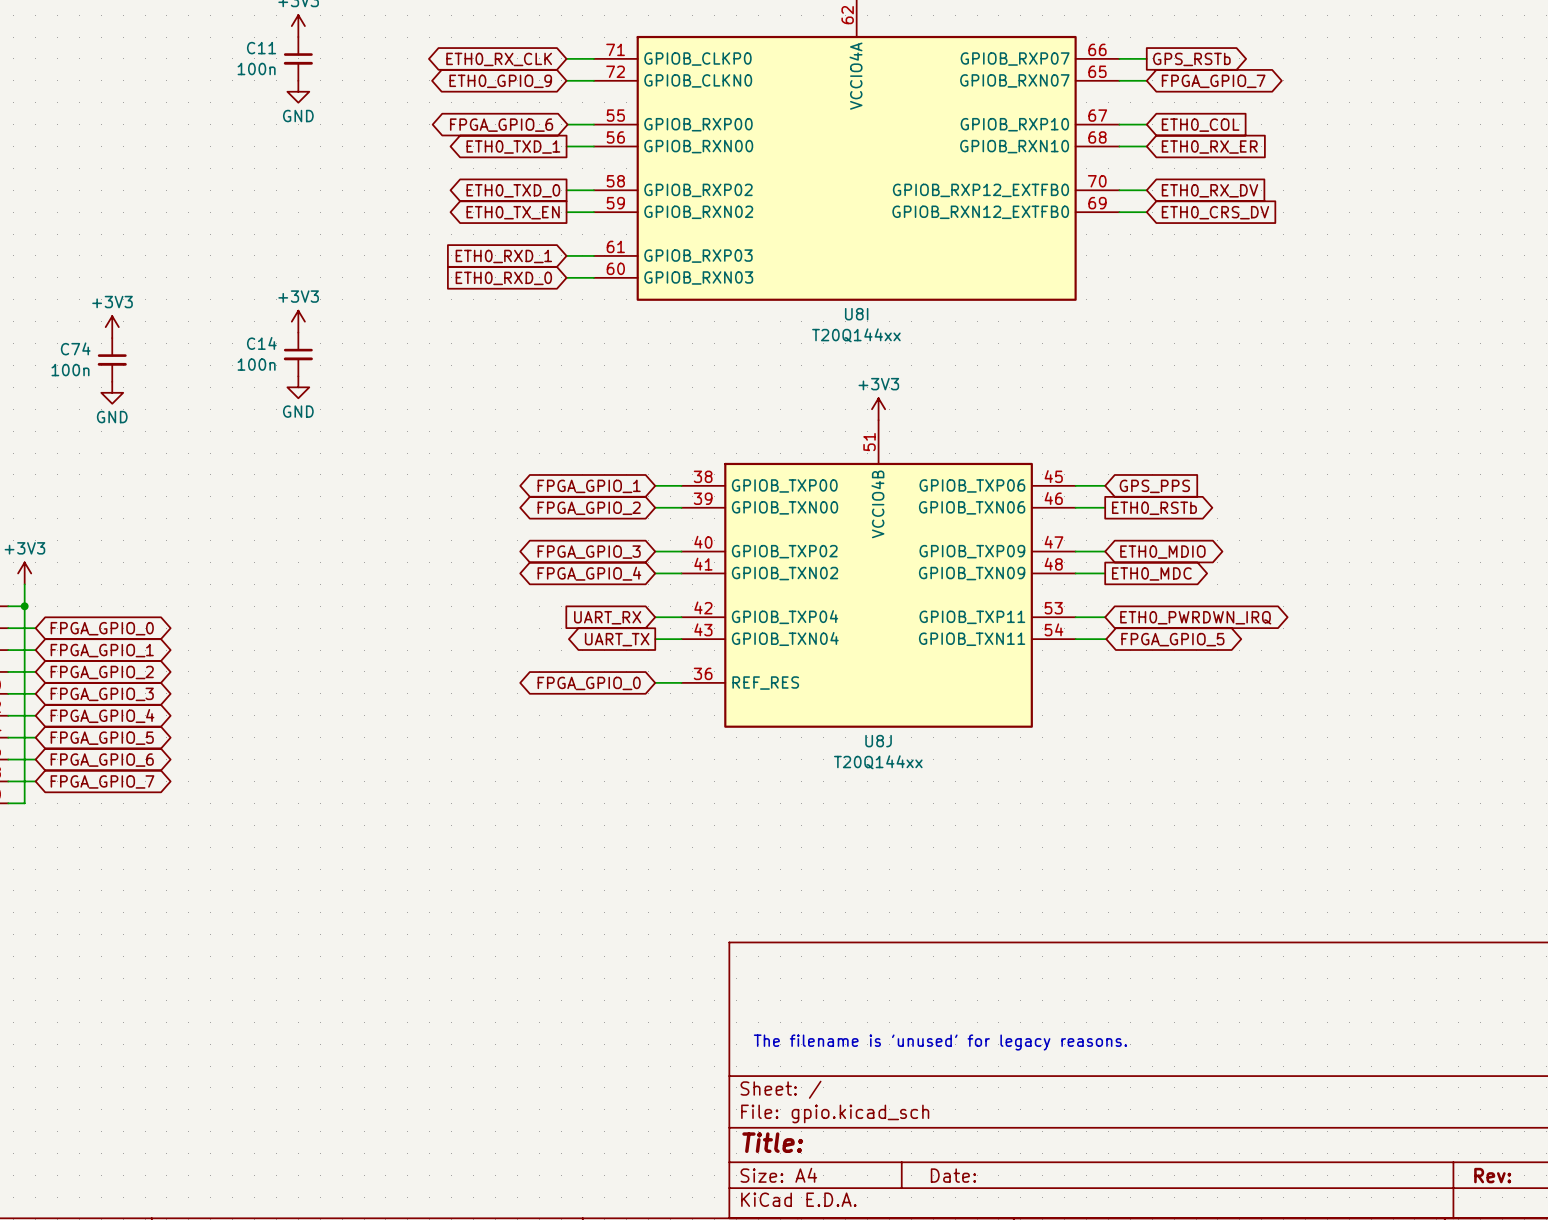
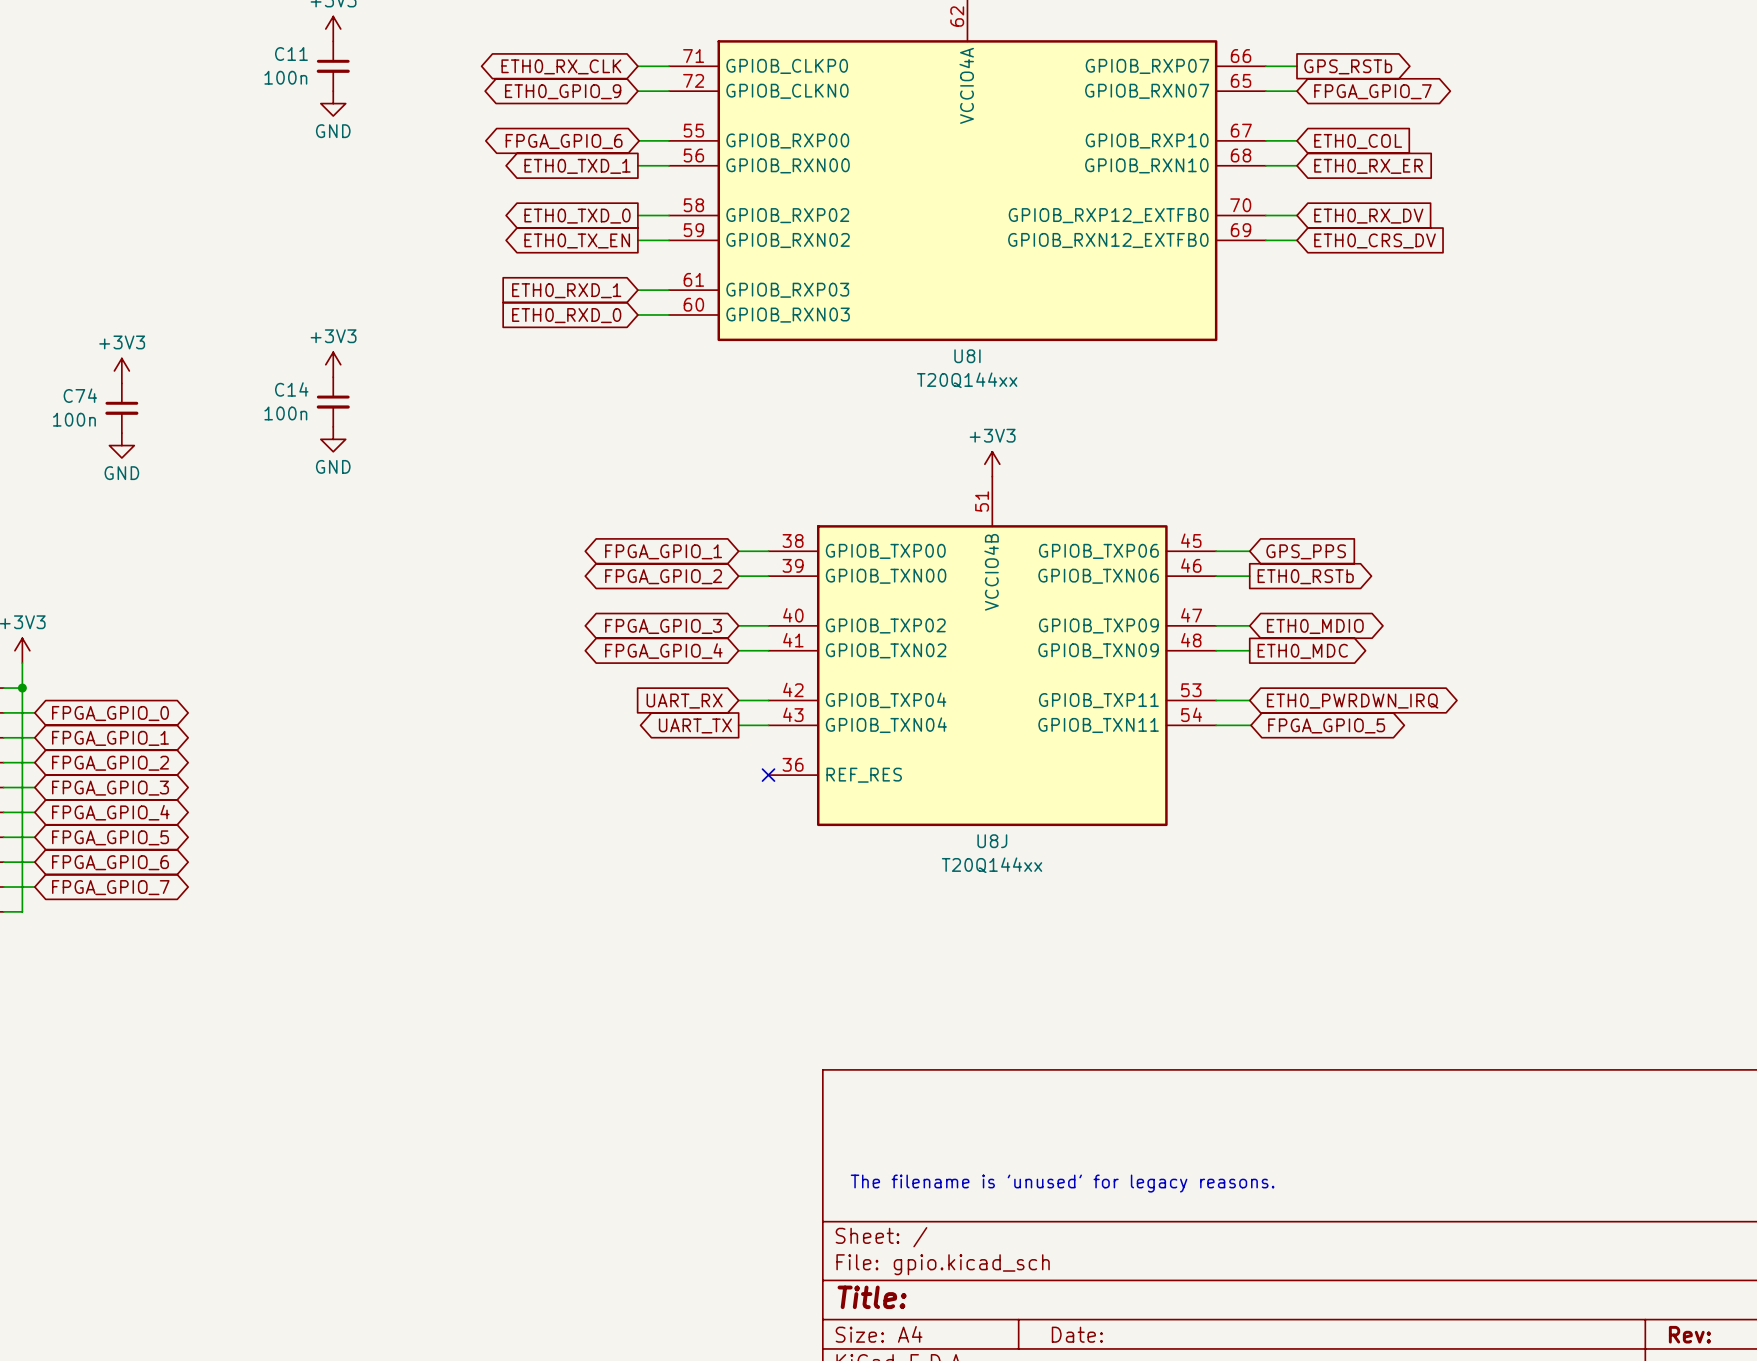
wire: (655, 682) (681, 682) -> none
no-connect mark: none -> (768, 775)
global label: FPGA_GPIO_0 (589, 683) -> none

